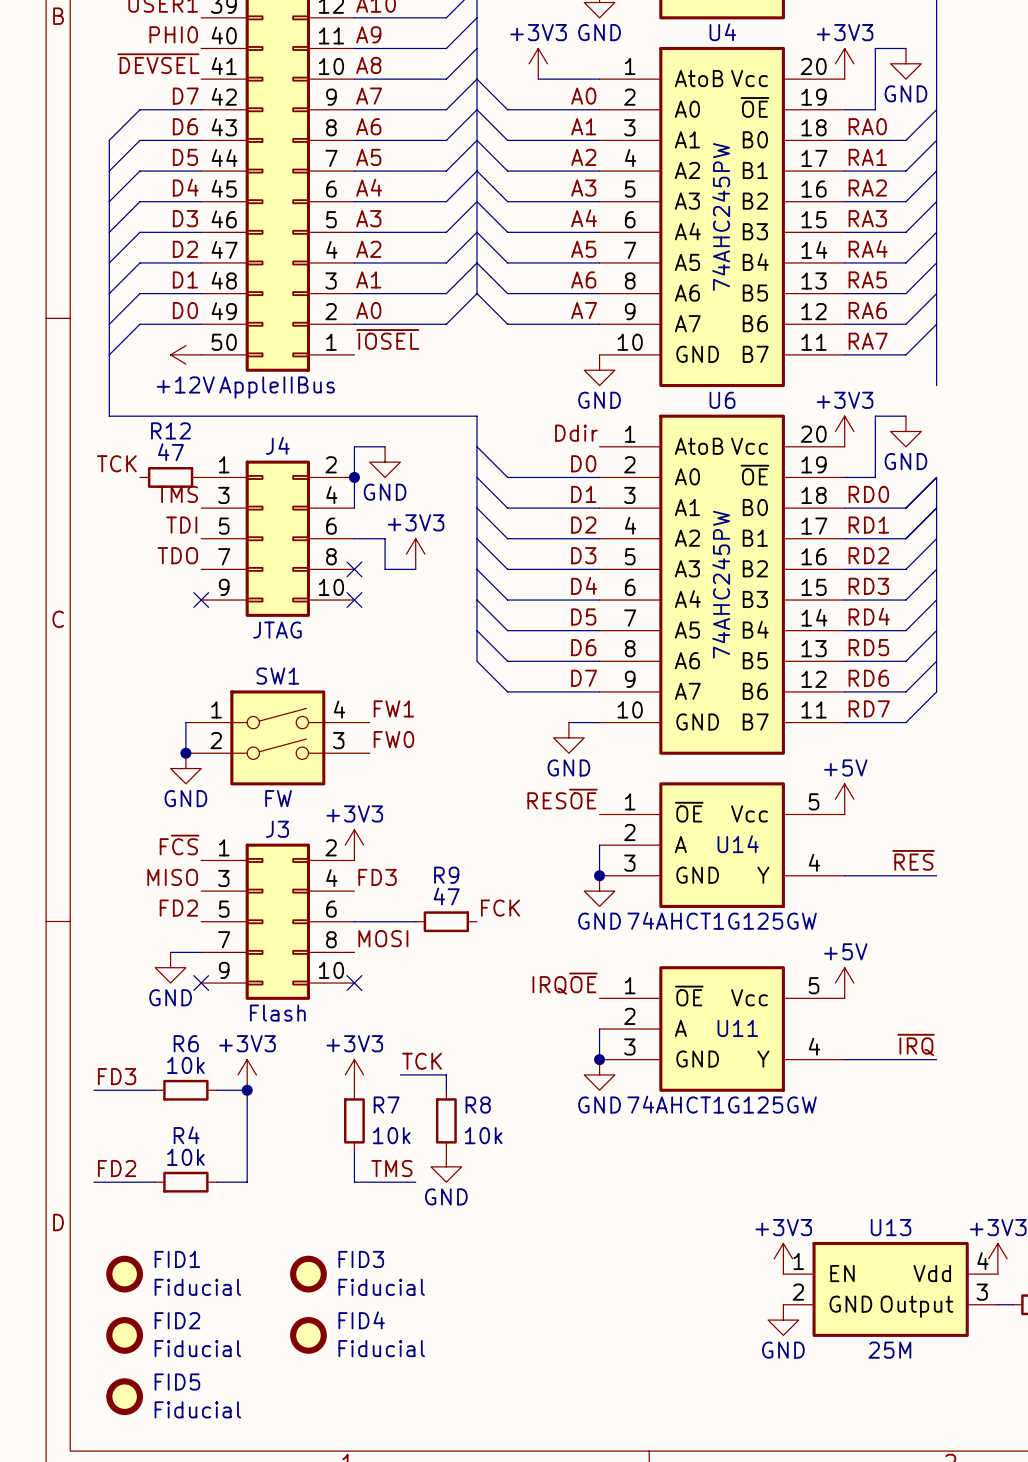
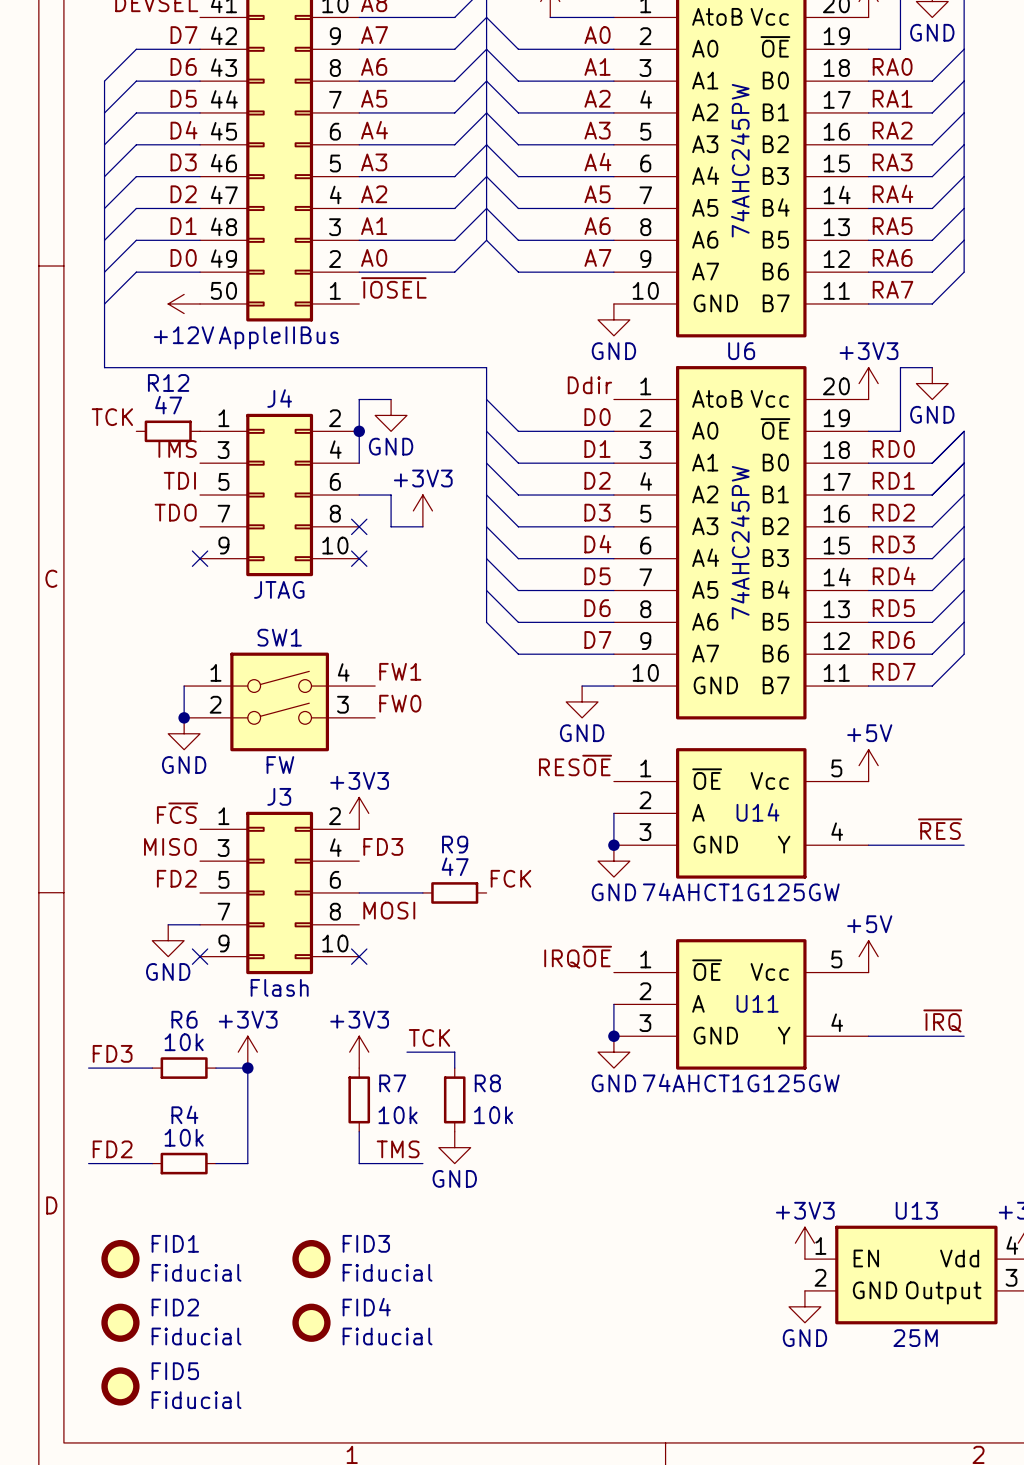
bus: (936, 324) (936, 385) -> none

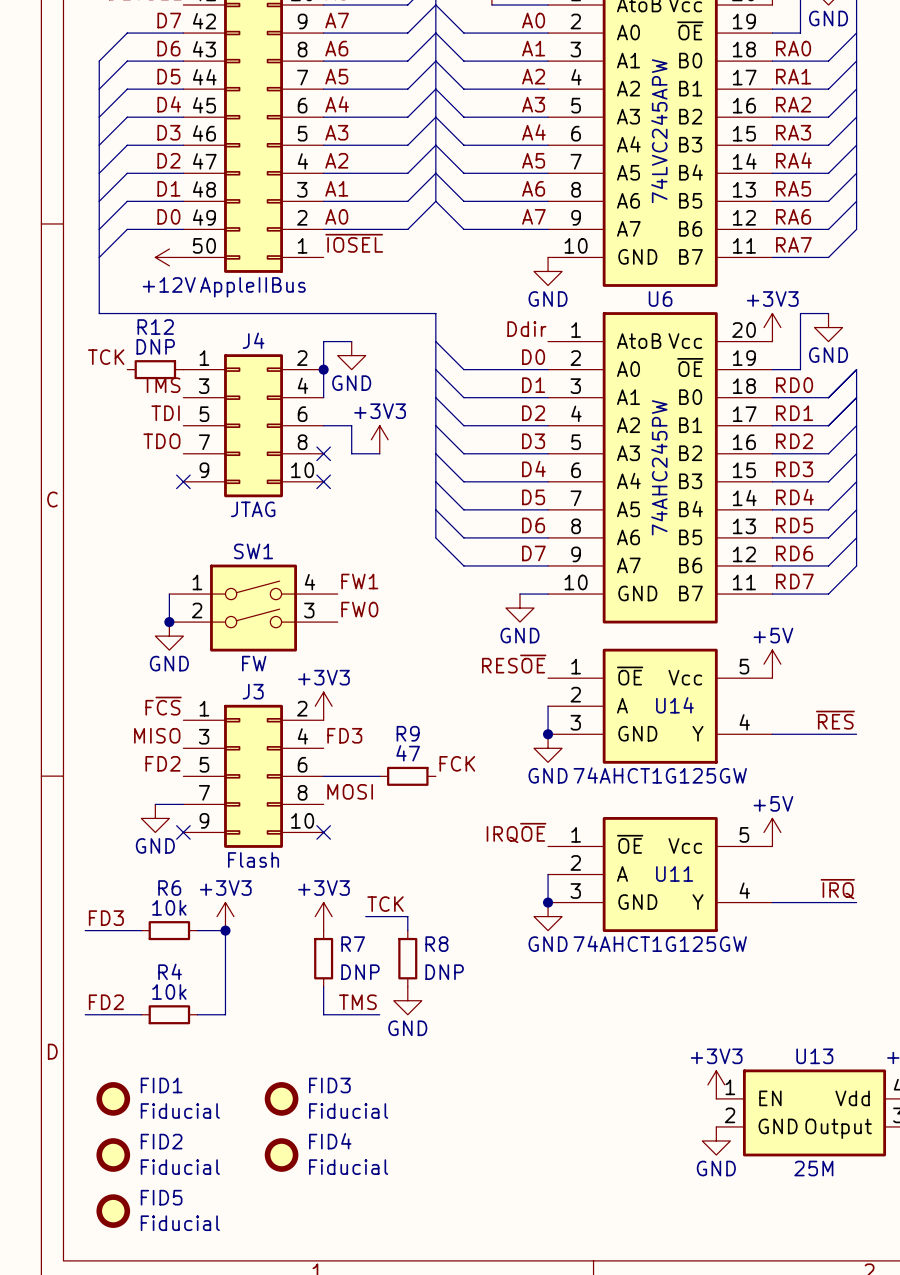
part value: 74AHC245PW (740, 160) -> 74LVC245APW (659, 131)
R12 value: 47 (168, 405) -> DNP (155, 346)
R7 value: 10k (398, 1115) -> DNP (360, 972)
R8 value: 10k (493, 1115) -> DNP (444, 972)

